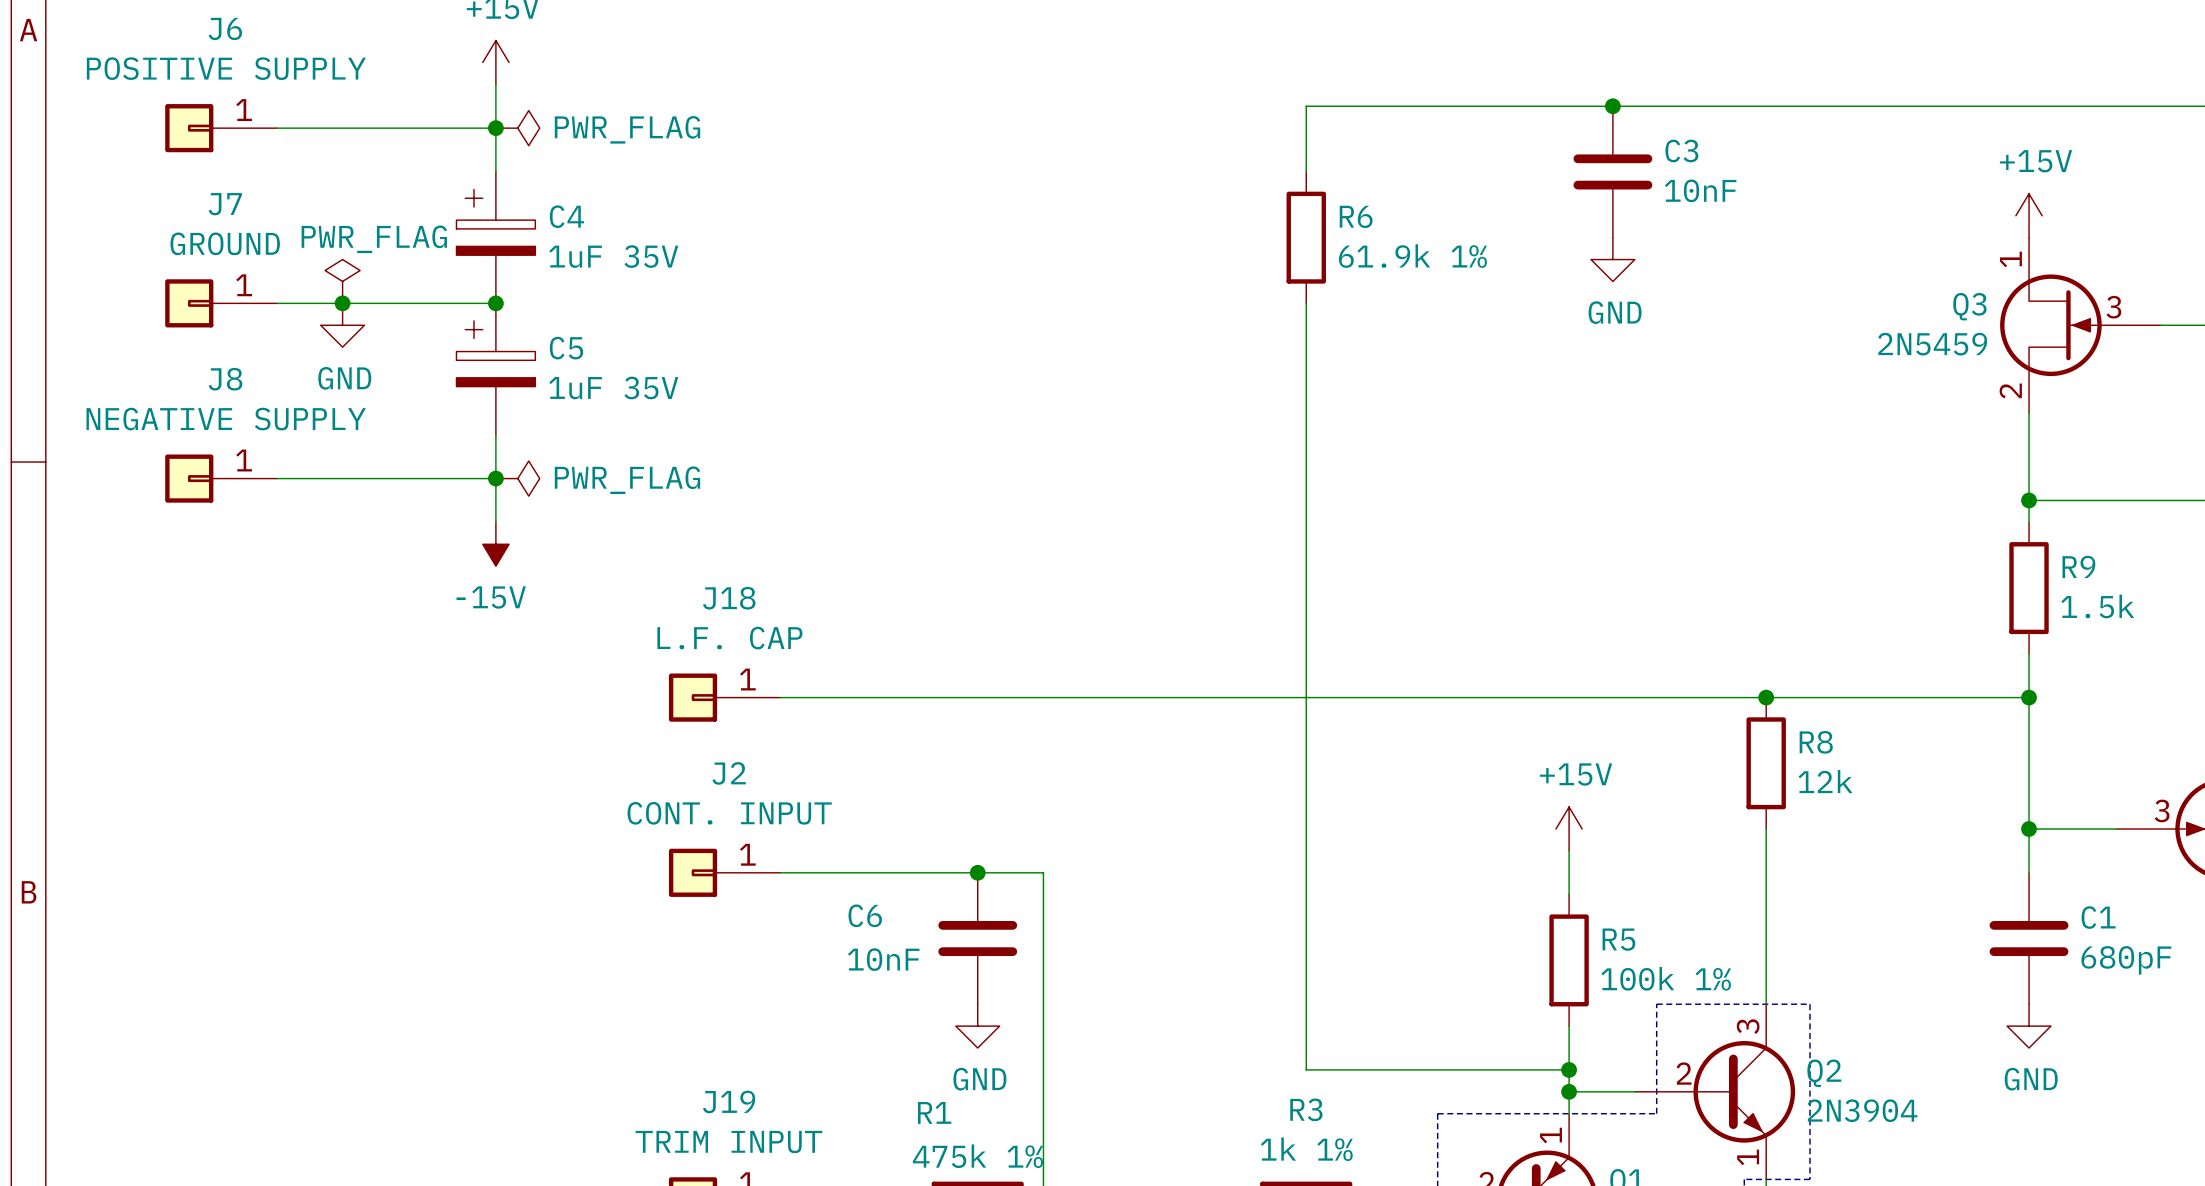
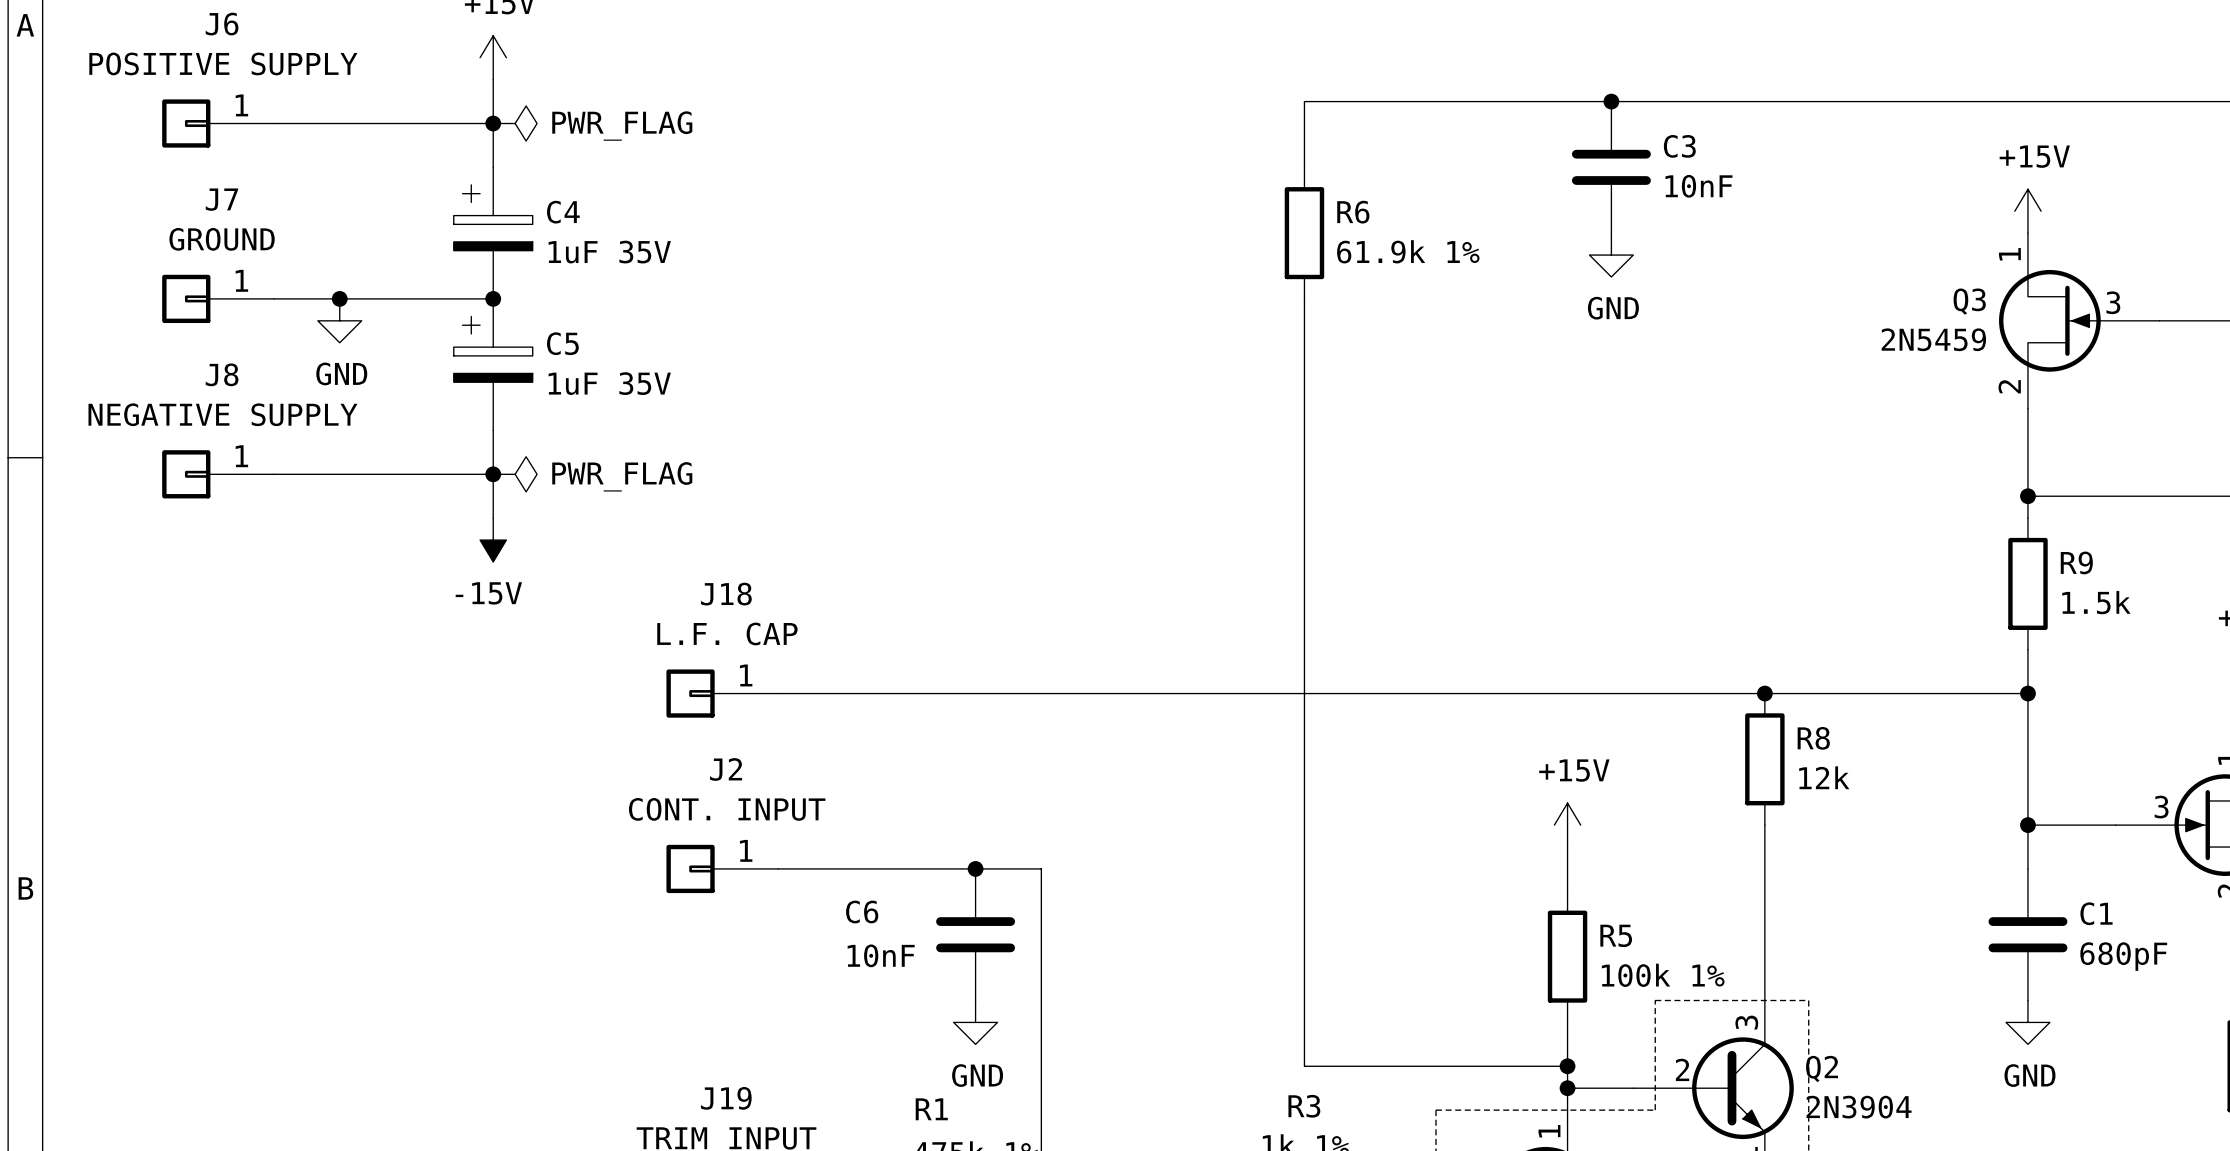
power symbol: PWR_FLAG (342, 281) -> none

